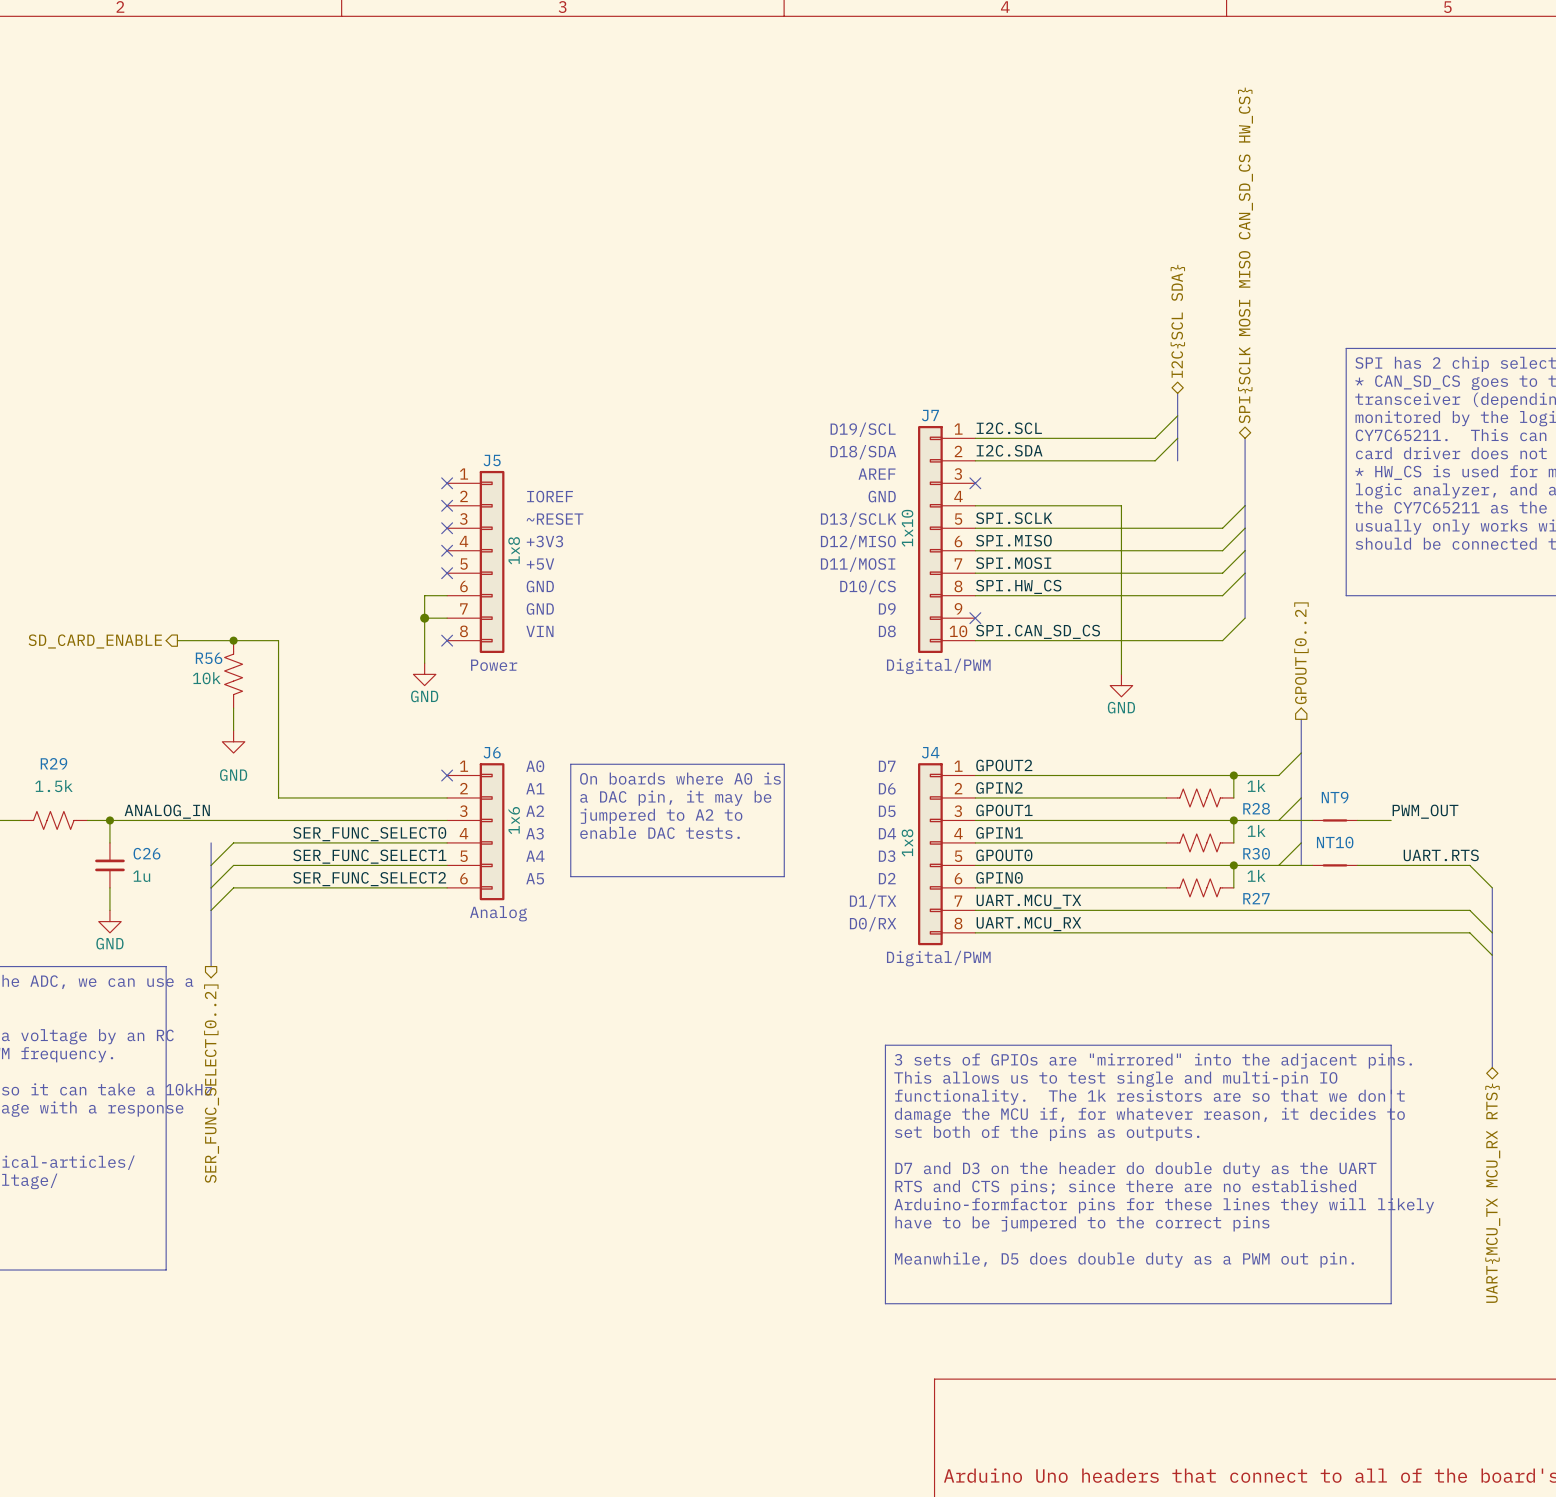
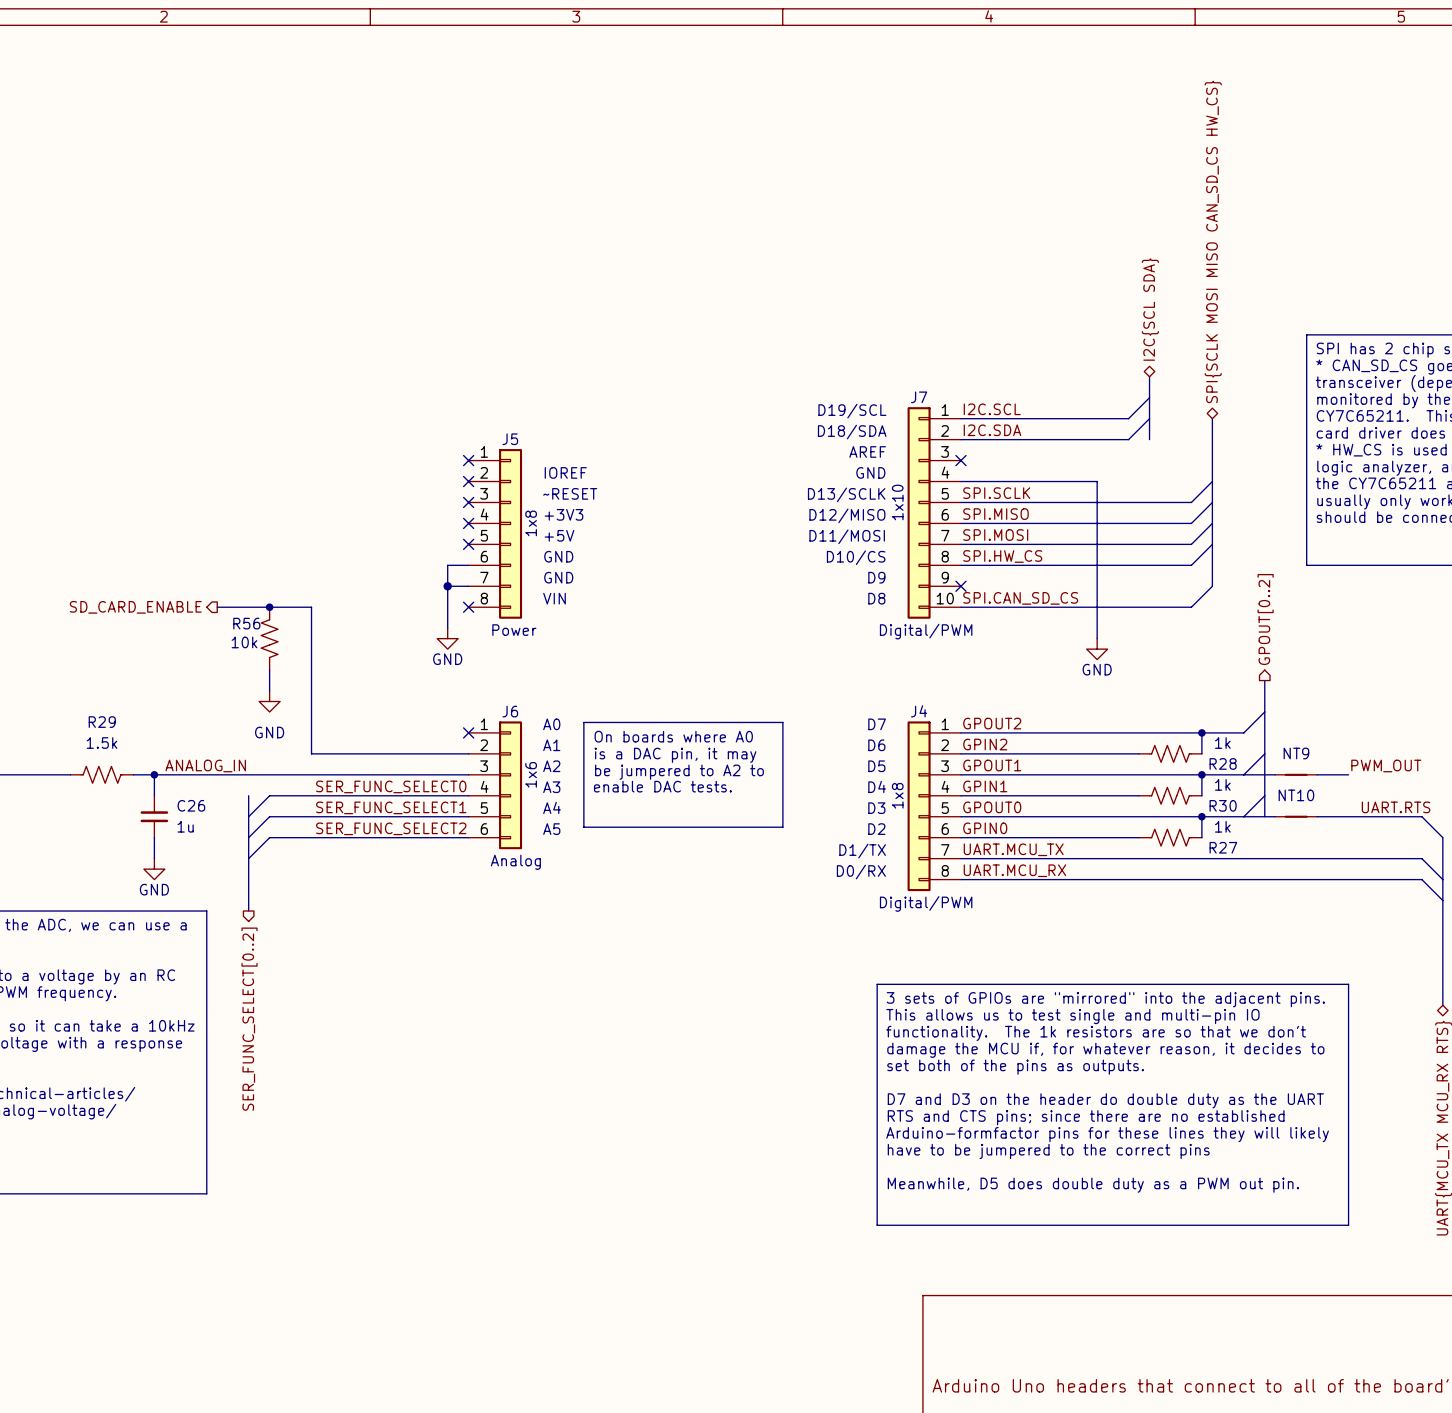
text: On boards where A0 is (680, 778) -> On boards where A0 (673, 736)
text: a DAC pin, it may be (675, 798) -> is a DAC pin, it may (675, 755)
text: jumpered to A2 to (661, 816) -> be jumpered to A2 to (679, 772)

